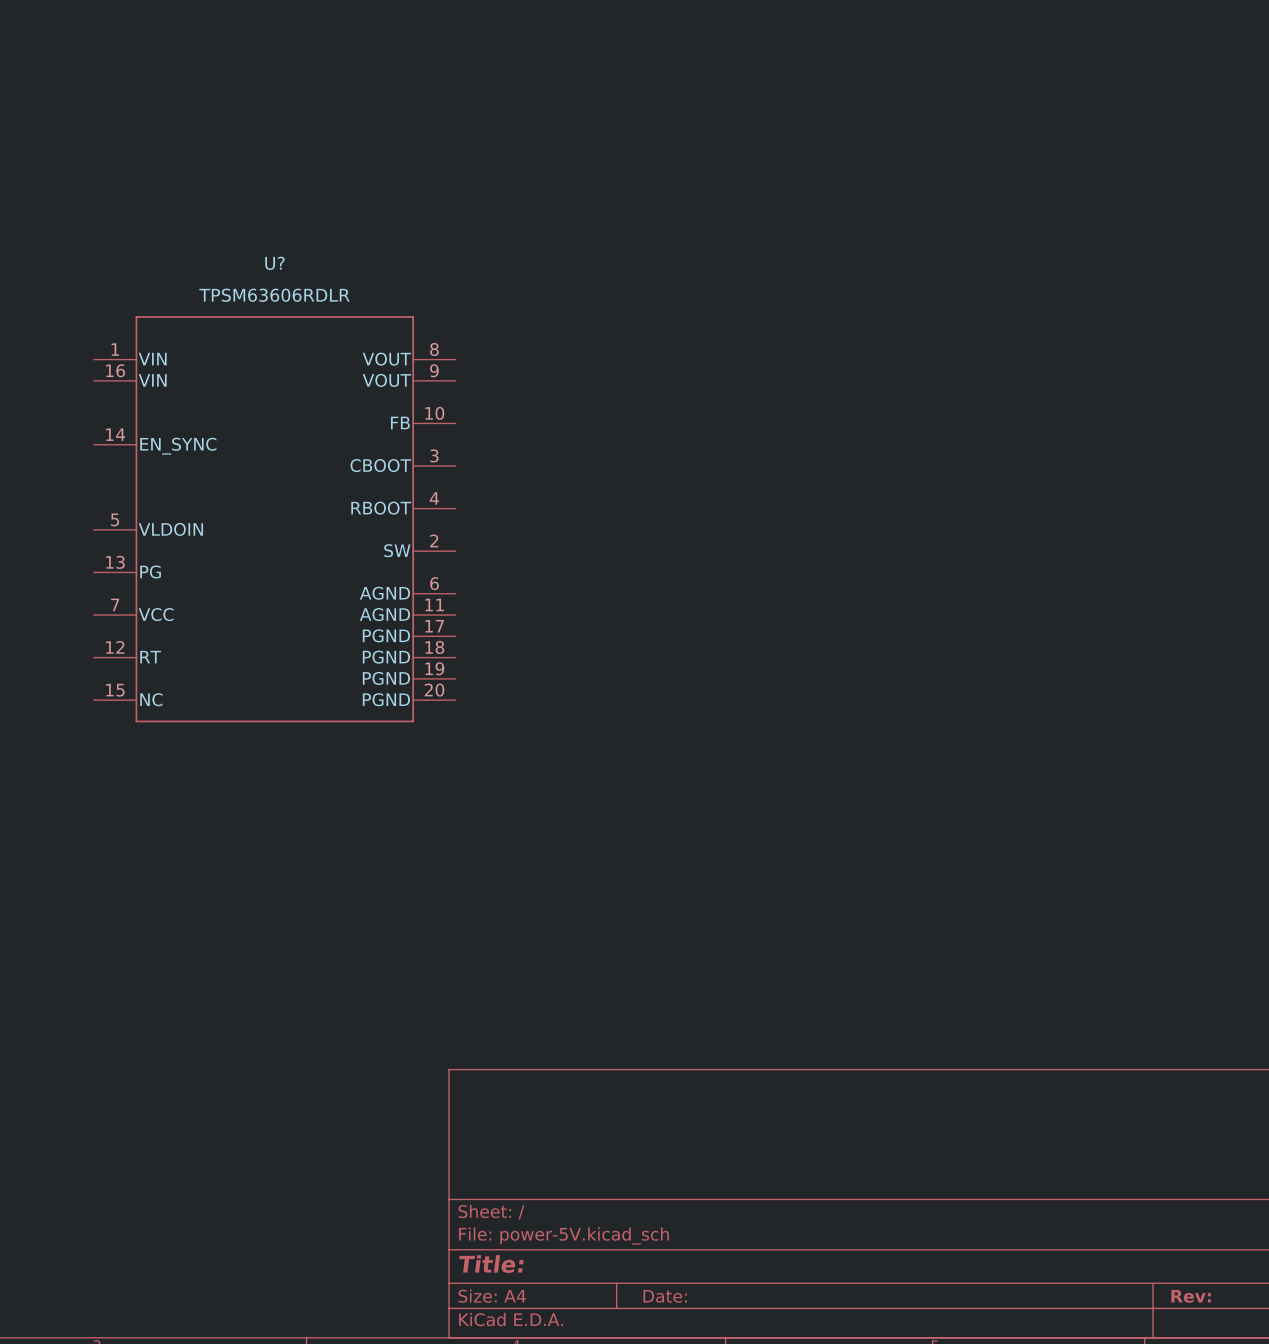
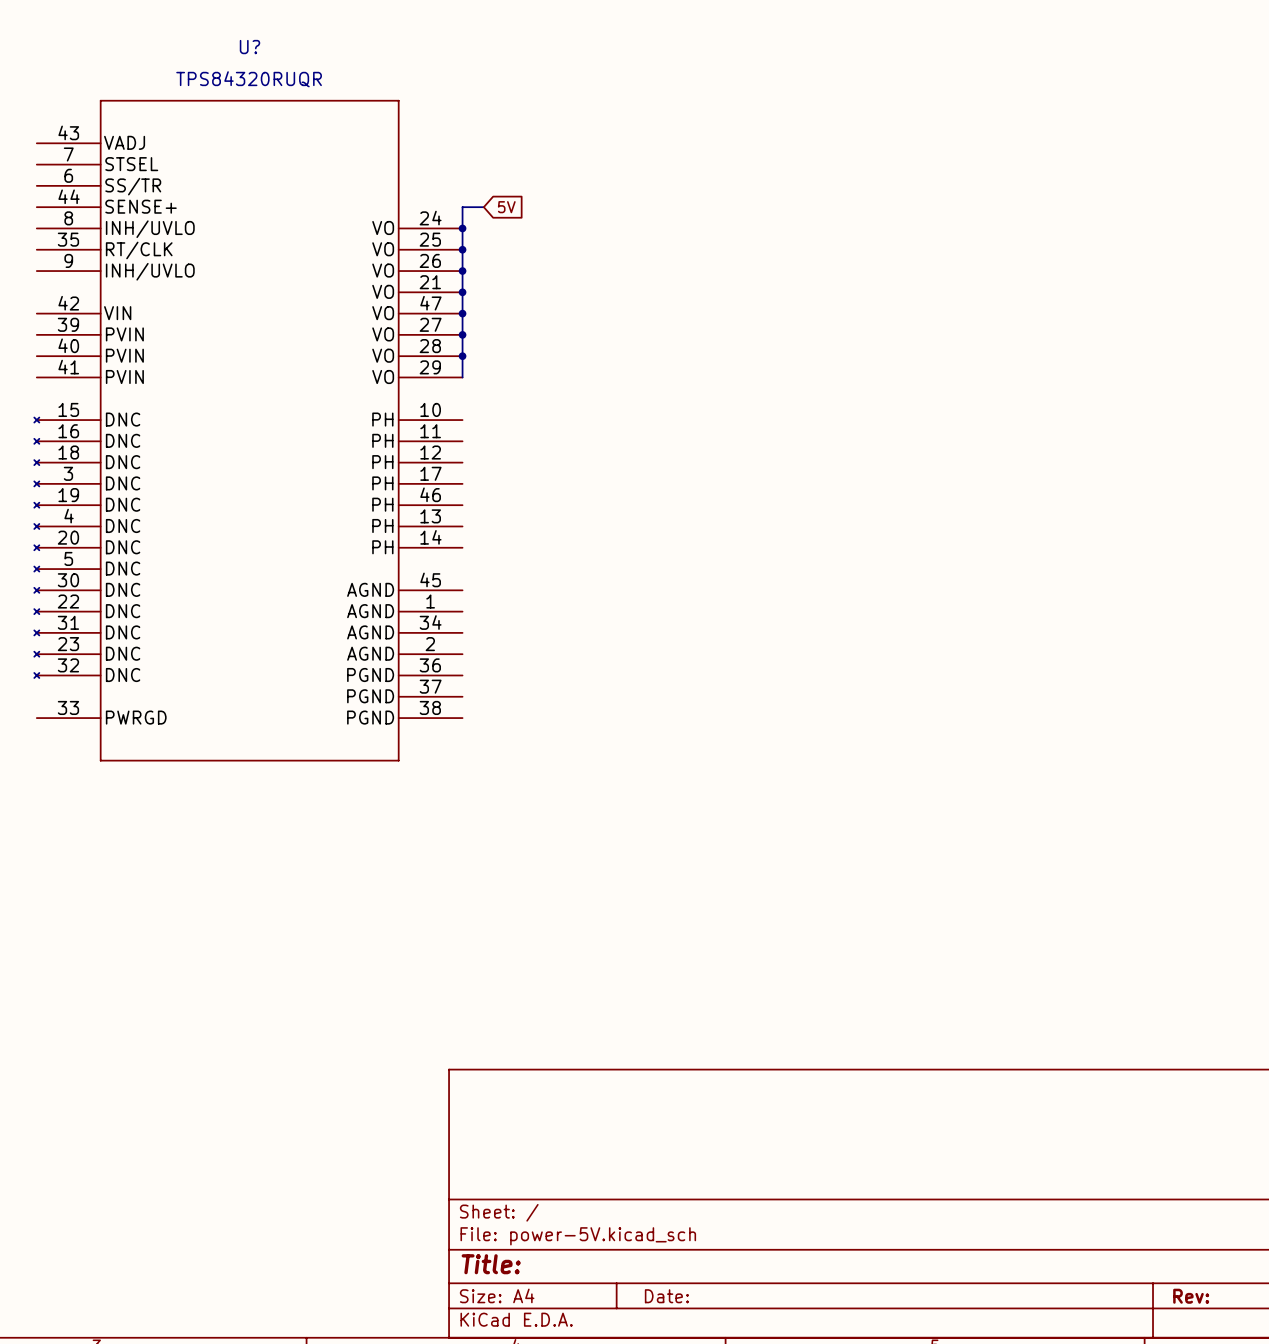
wire: none -> (483, 207) (462, 207) (462, 377)
global label: none -> 5V (506, 207)
junction: none -> (462, 228)
junction: none -> (462, 249)
junction: none -> (462, 271)
junction: none -> (462, 292)
junction: none -> (462, 313)
junction: none -> (462, 334)
junction: none -> (462, 356)
U?: none -> TPS84320RUQR (248, 430)
U?: TPSM63606RDLR (274, 519) -> none

